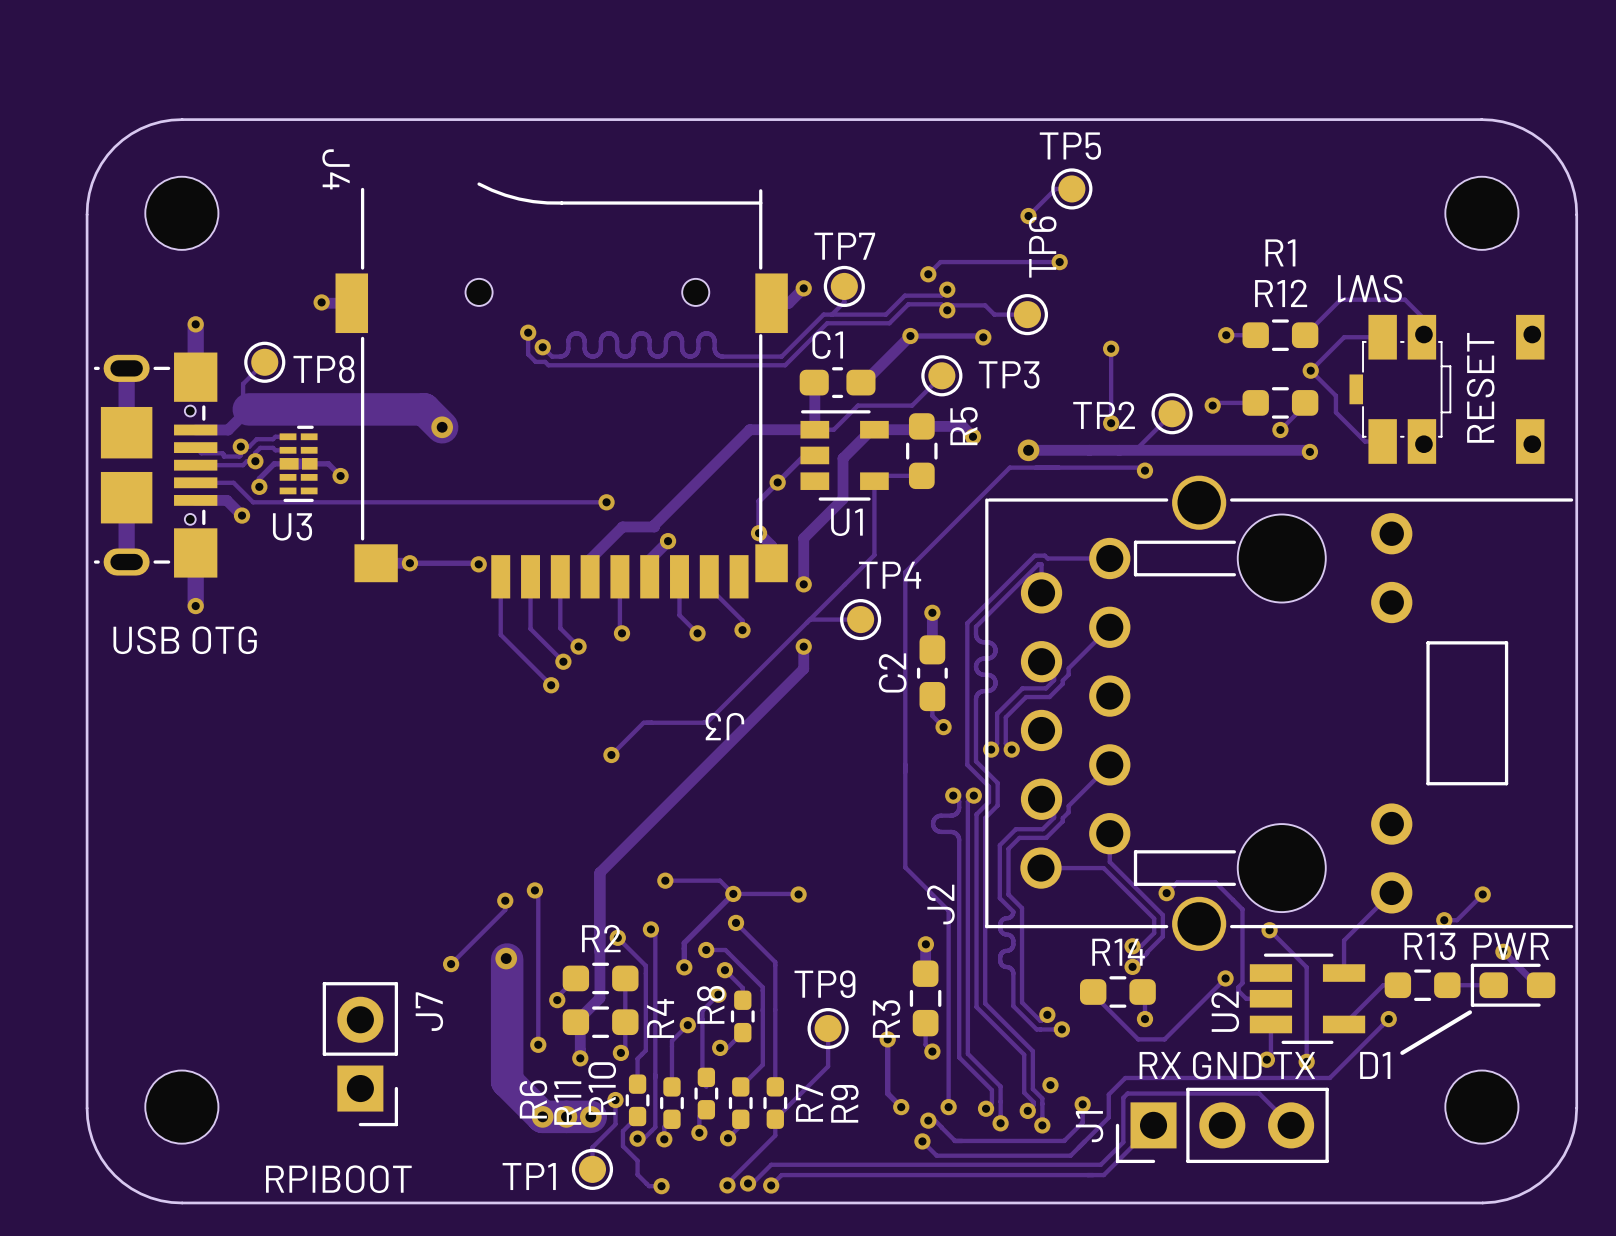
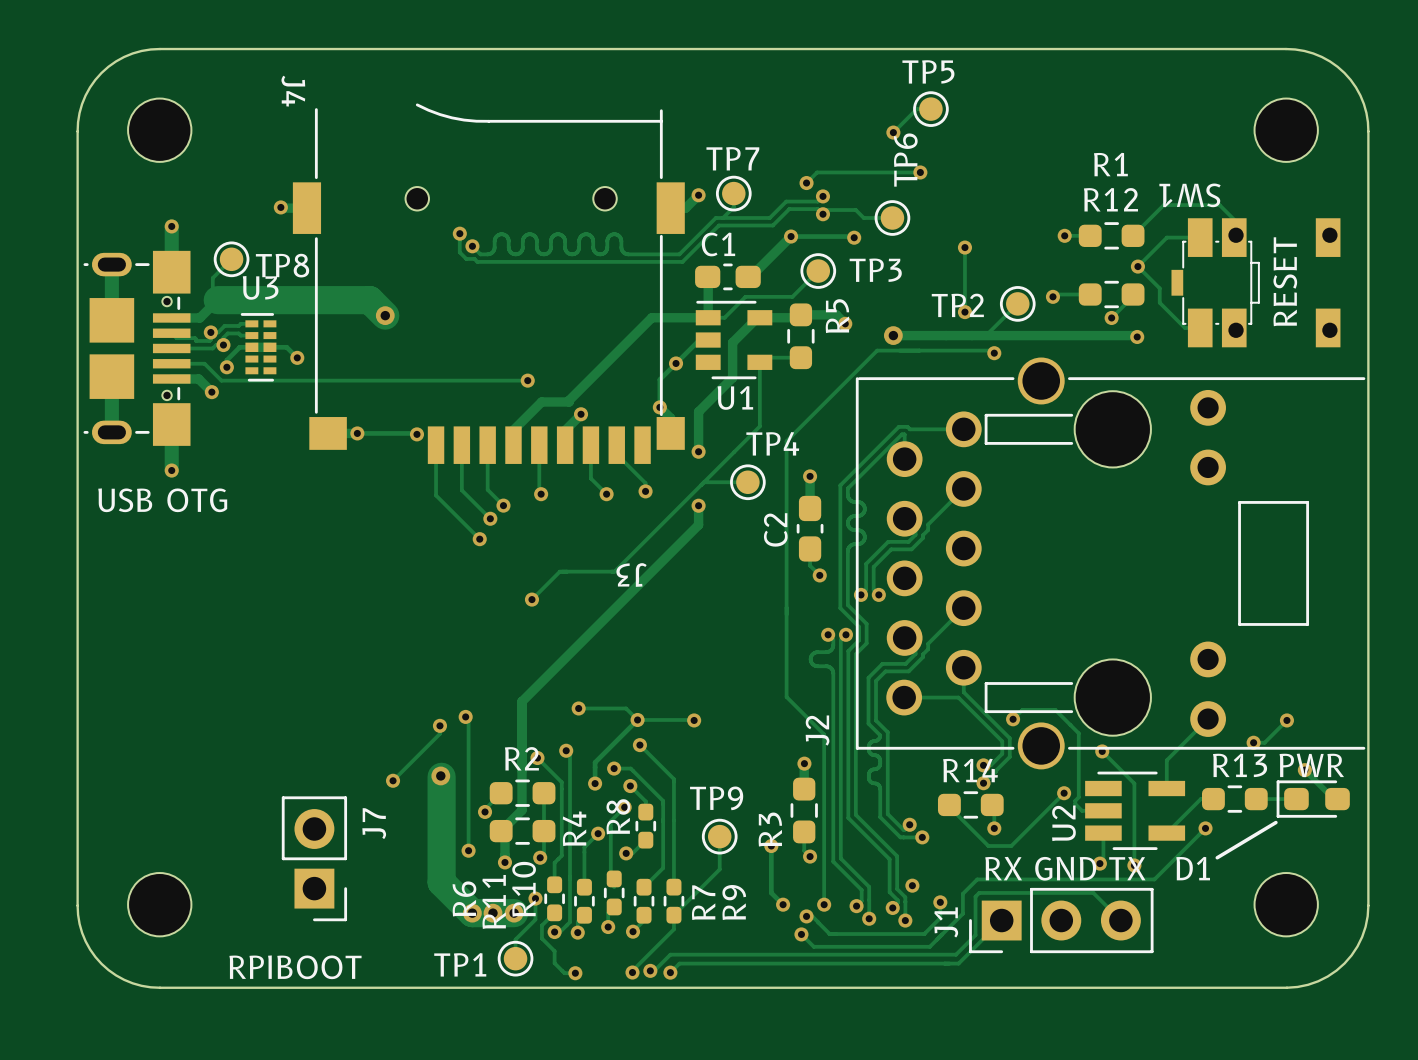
U3 footprint: [279, 425, 318, 503] -> [240, 313, 277, 382]
U3 name position: U3 (292, 526) -> U3 (260, 287)

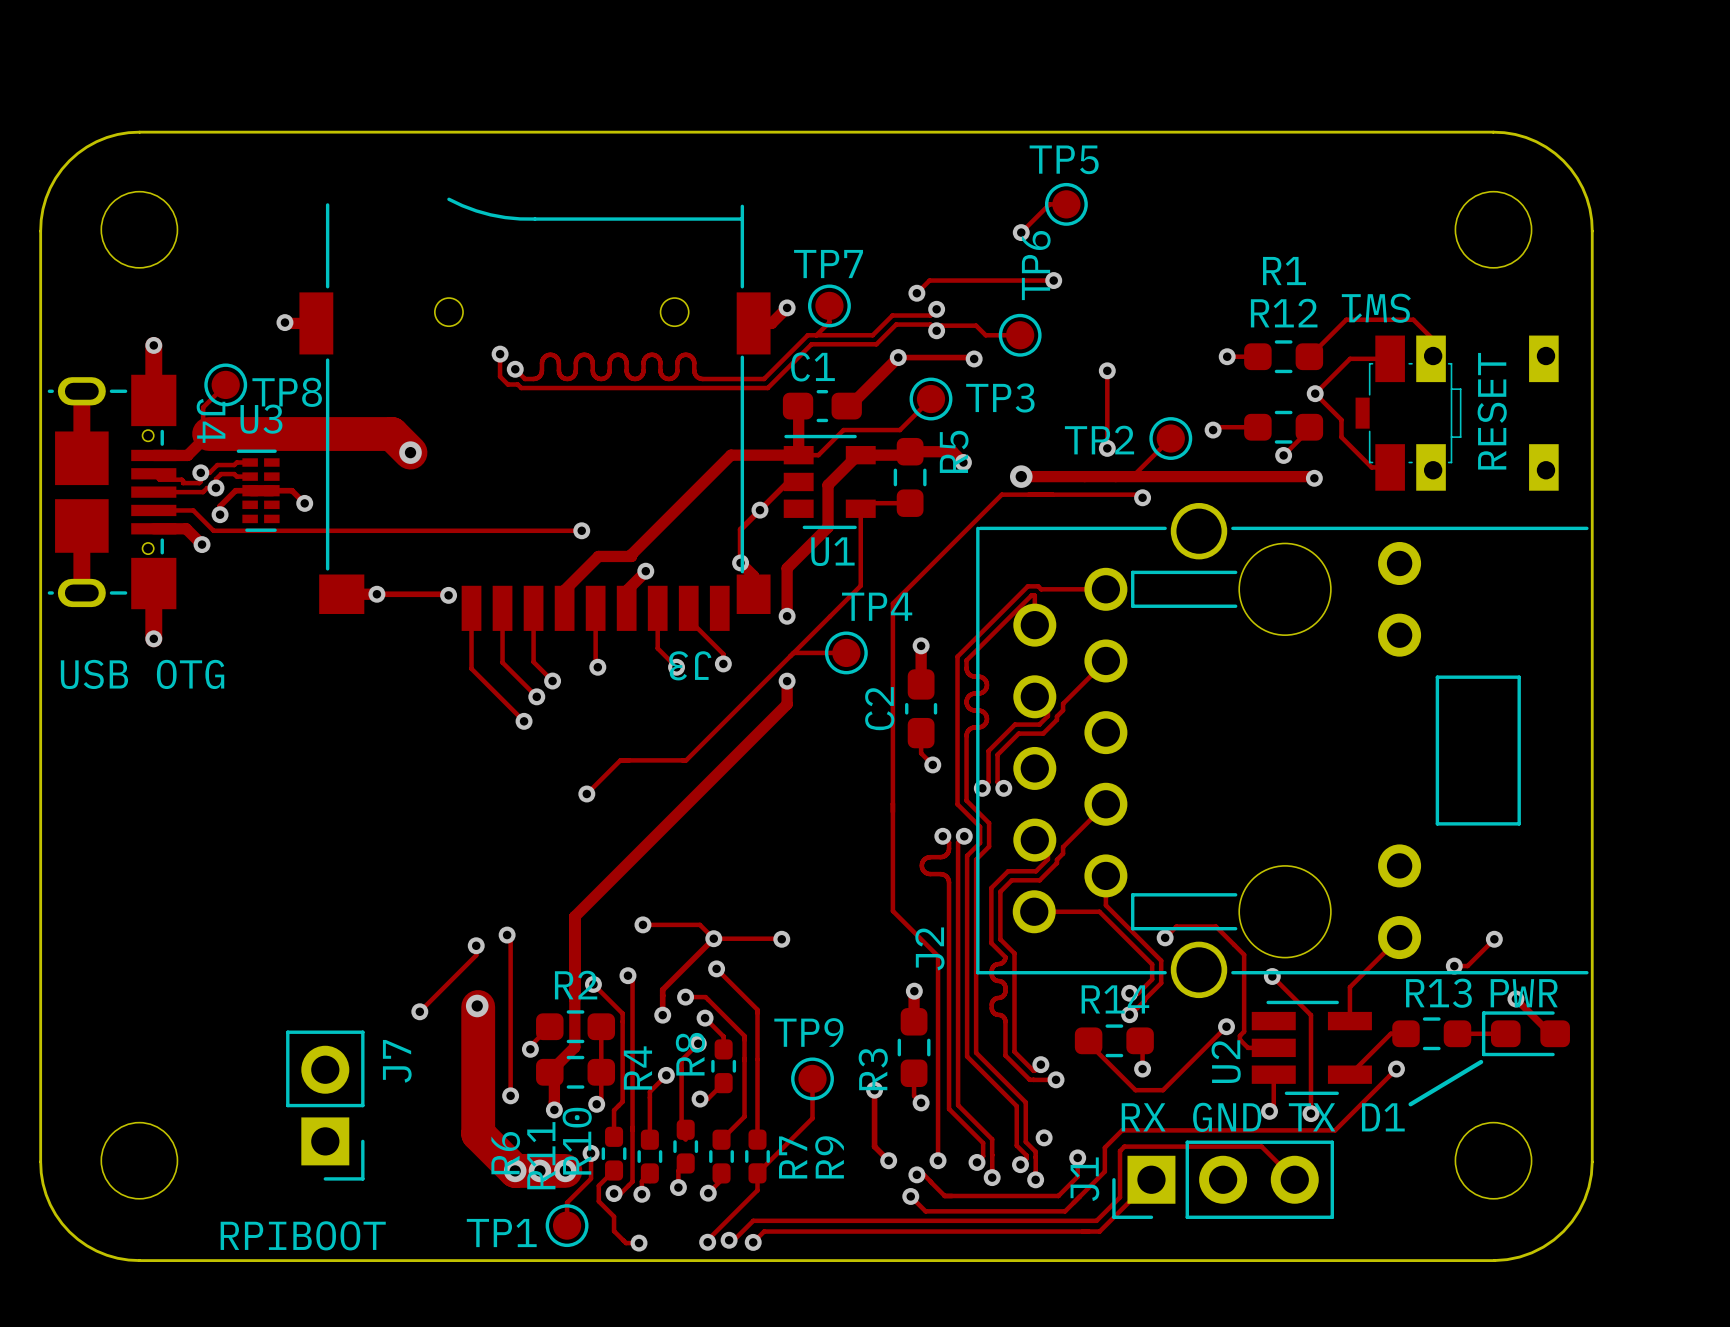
J4 name position: J4 (293, 91) -> J4 (211, 420)
J3 name position: J3 (631, 574) -> J3 (690, 665)

